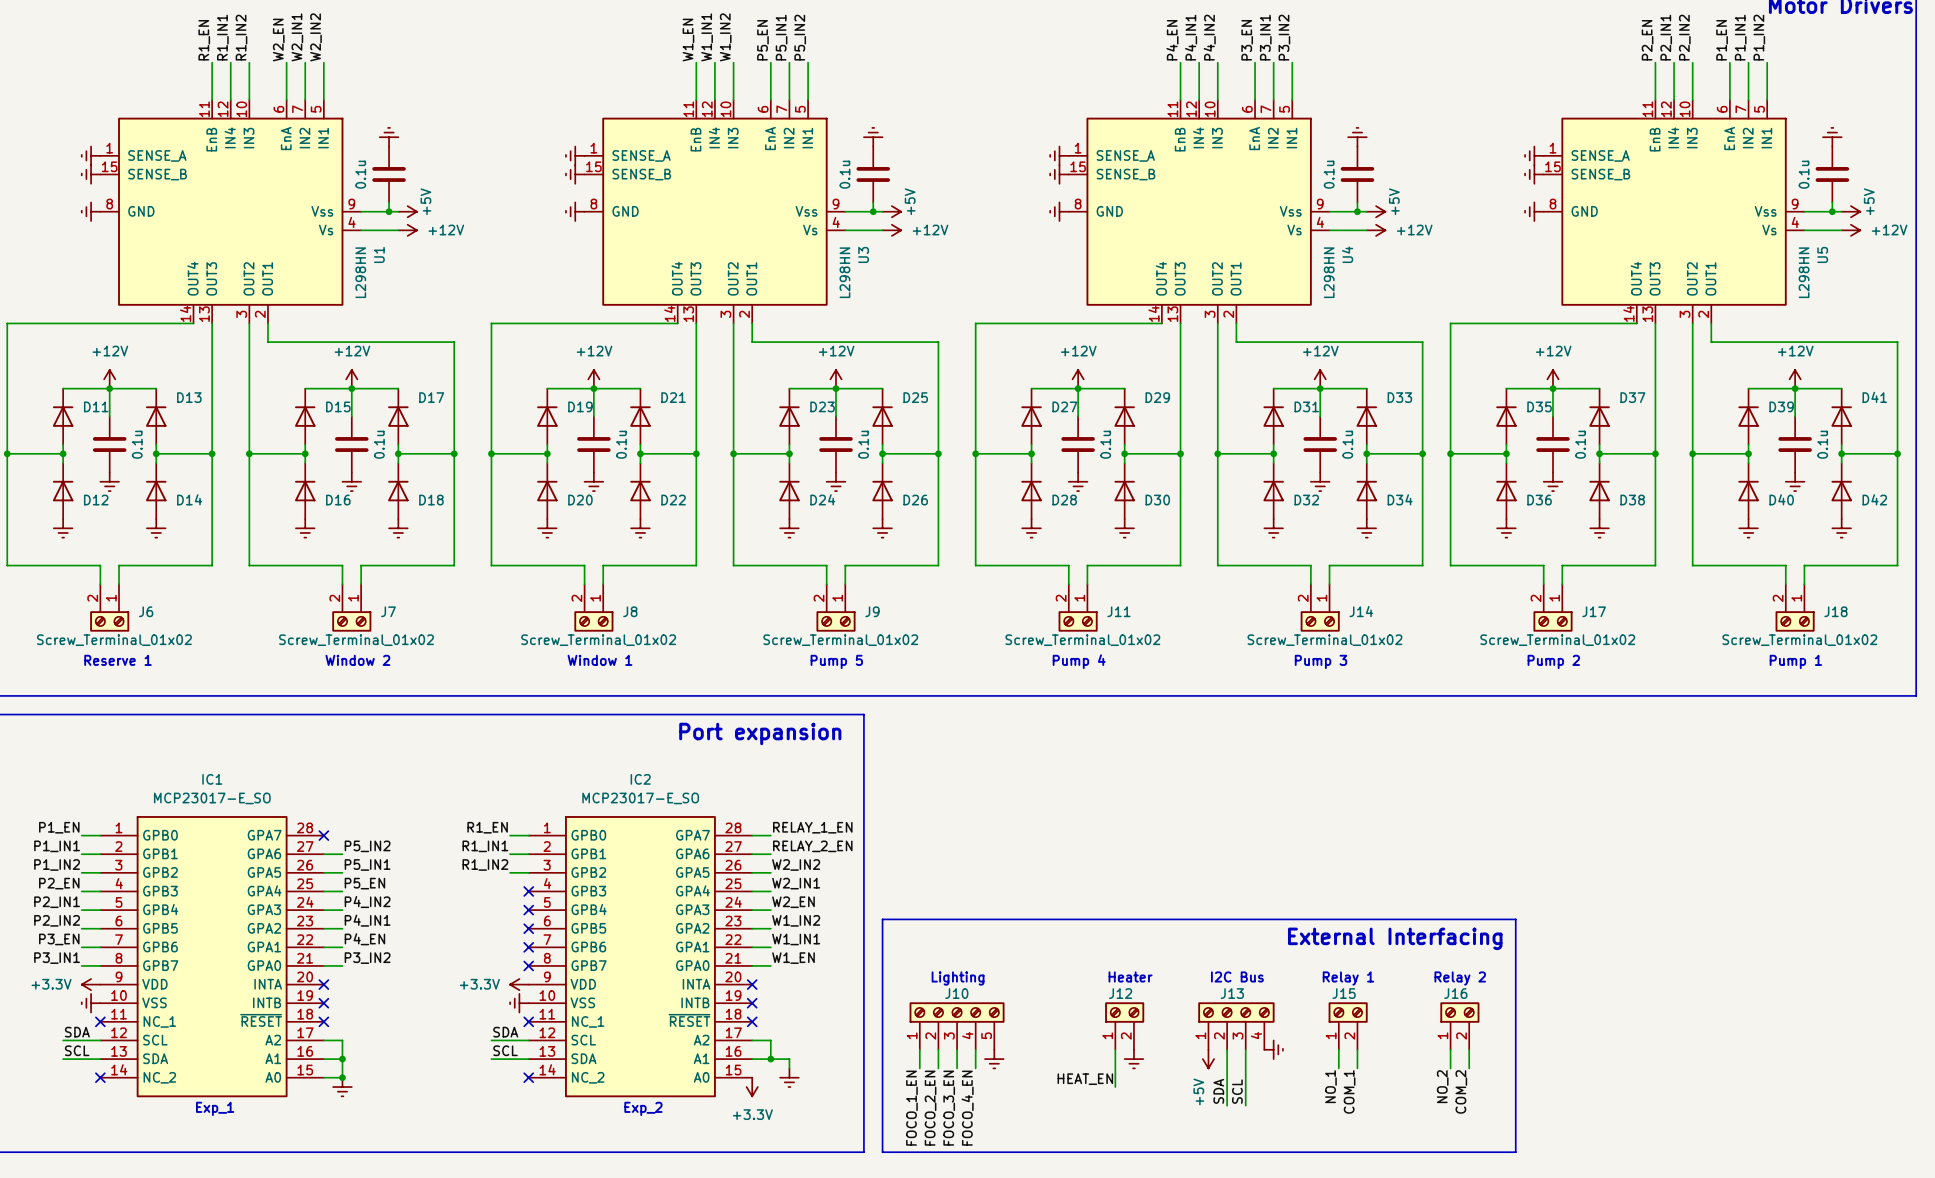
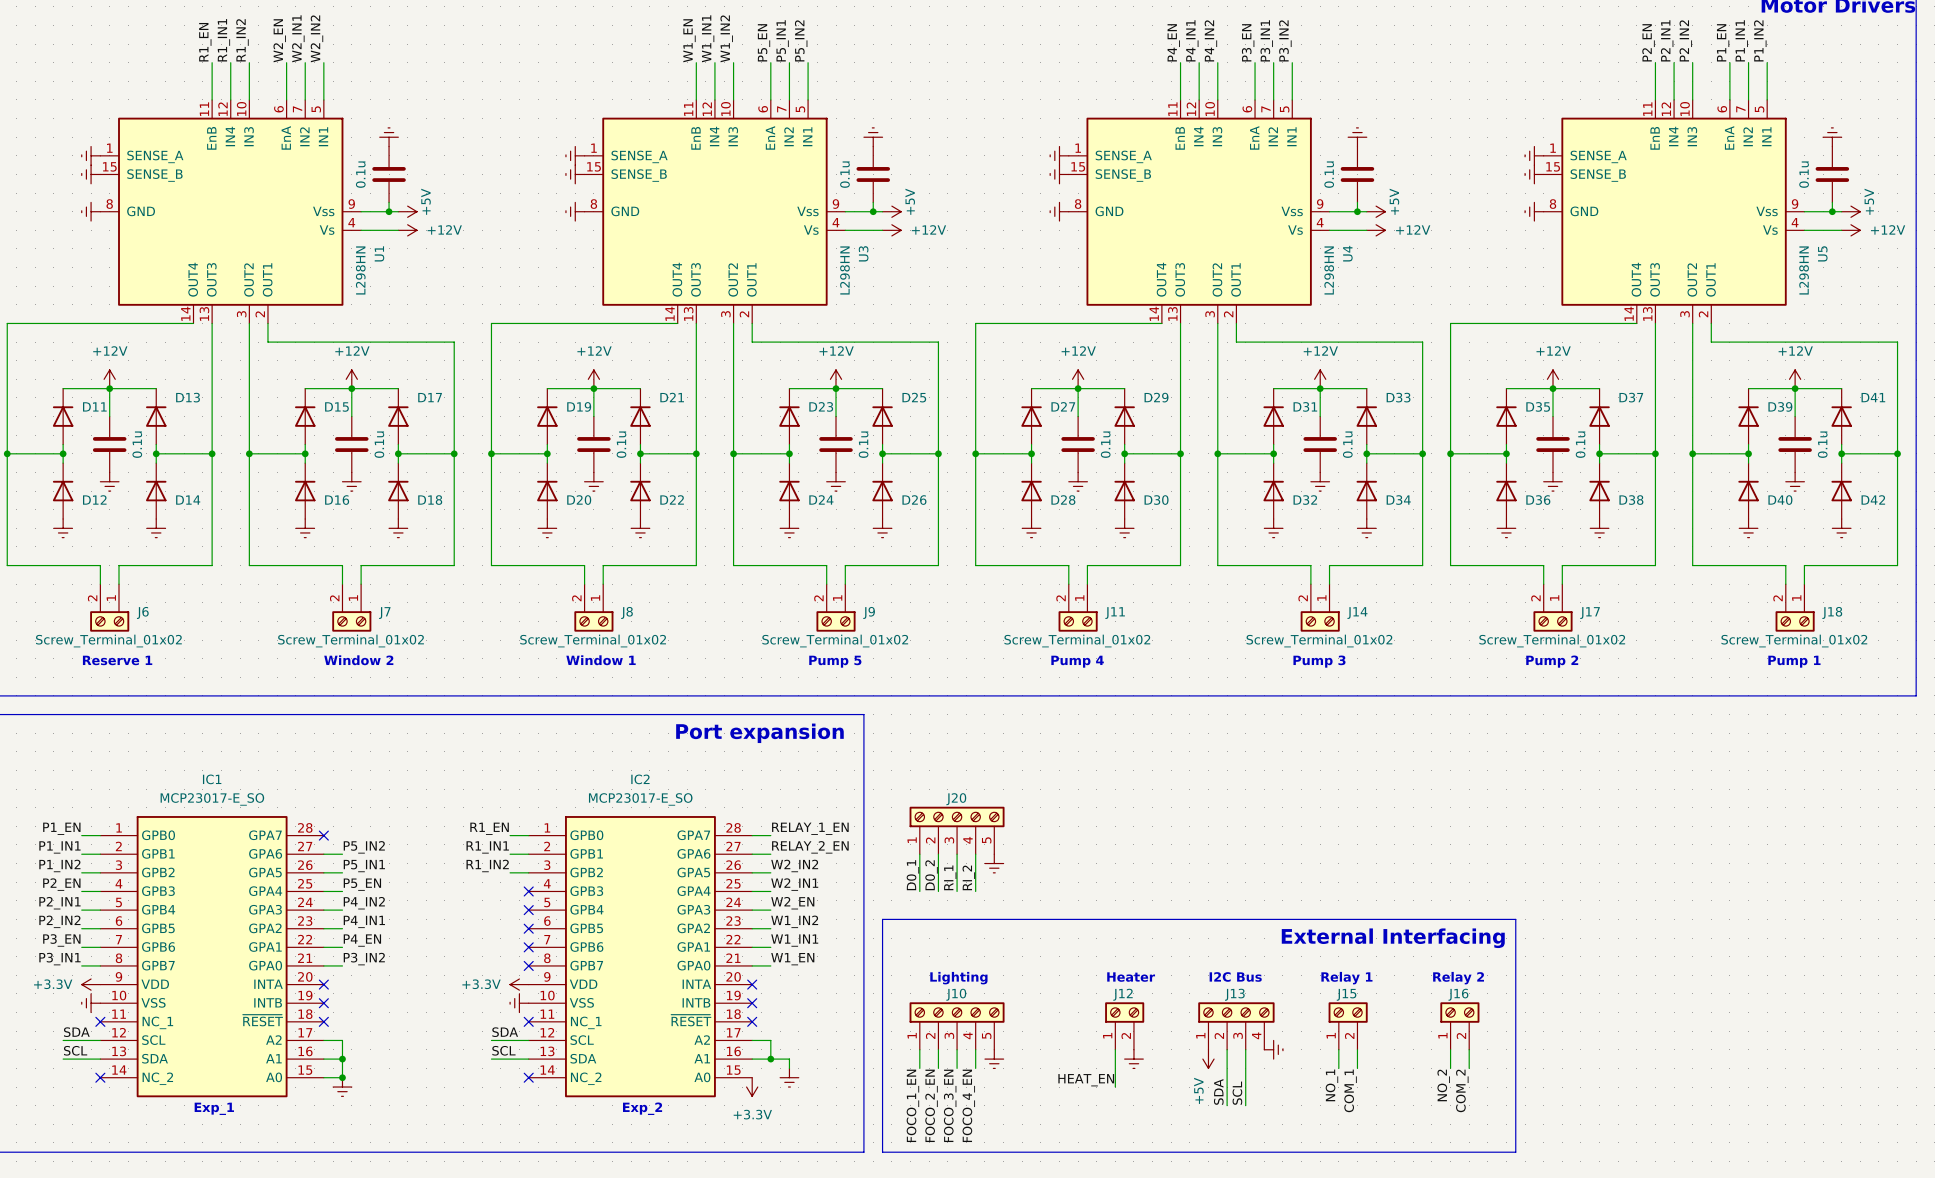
J20: none -> (957, 830)
wire: none -> (919, 854) (919, 891)
wire: none -> (938, 854) (938, 891)
wire: none -> (957, 854) (957, 891)
wire: none -> (975, 854) (975, 891)
power symbol: none -> (994, 863)
label: none -> D0_1 (912, 875)
label: none -> D0_2 (931, 875)
label: none -> RI_1 (950, 877)
label: none -> RI_2 (968, 877)

